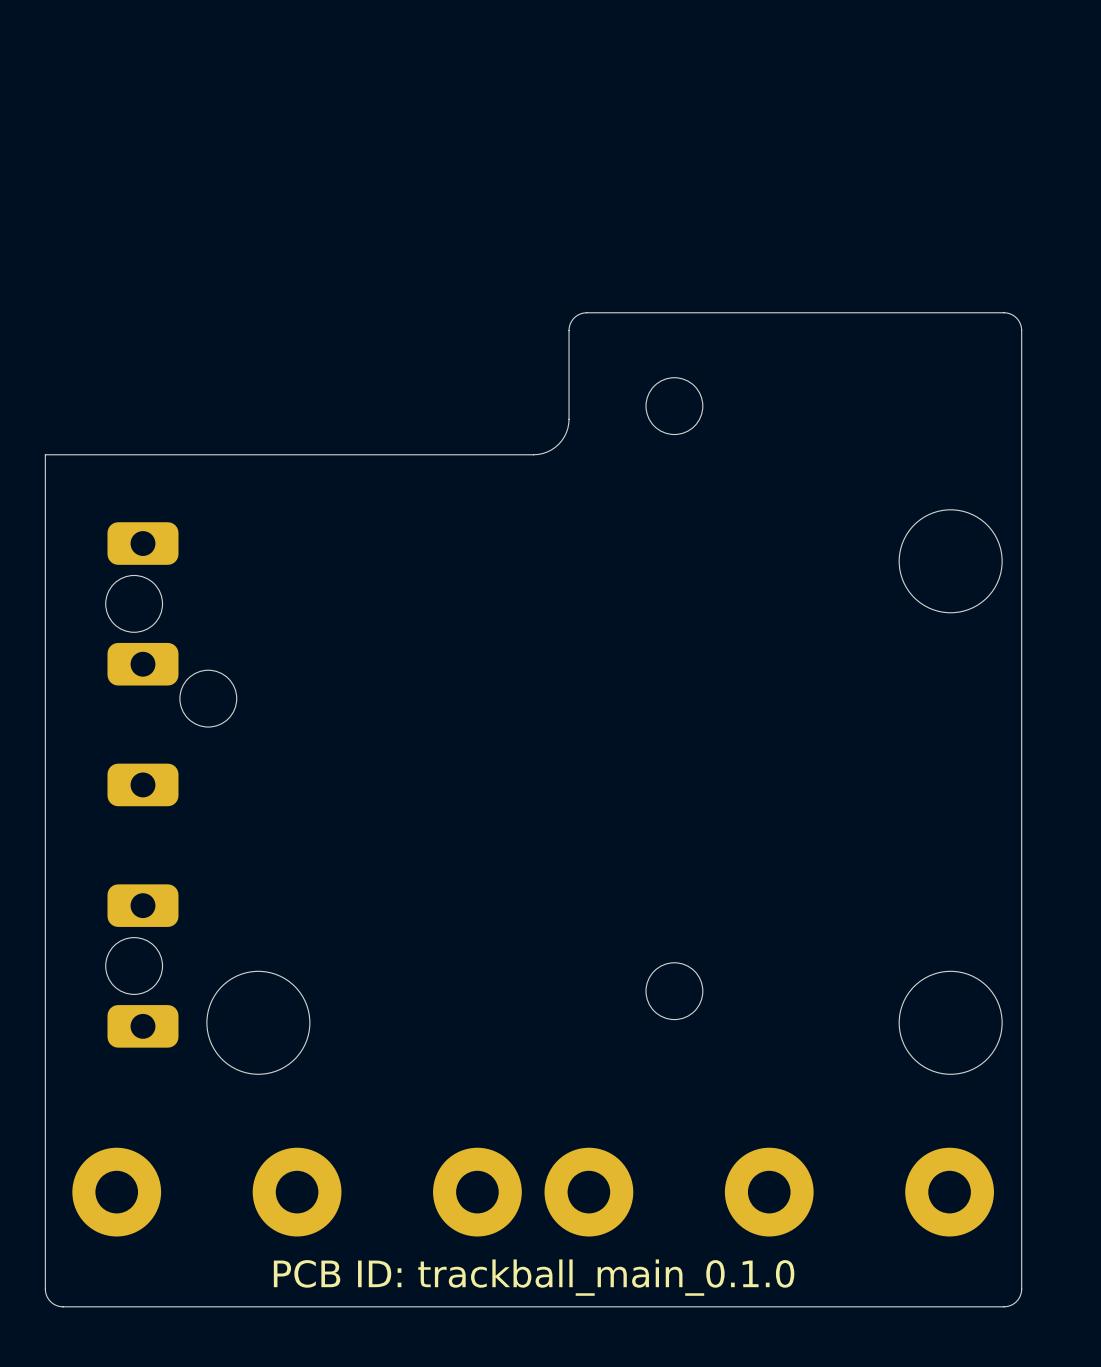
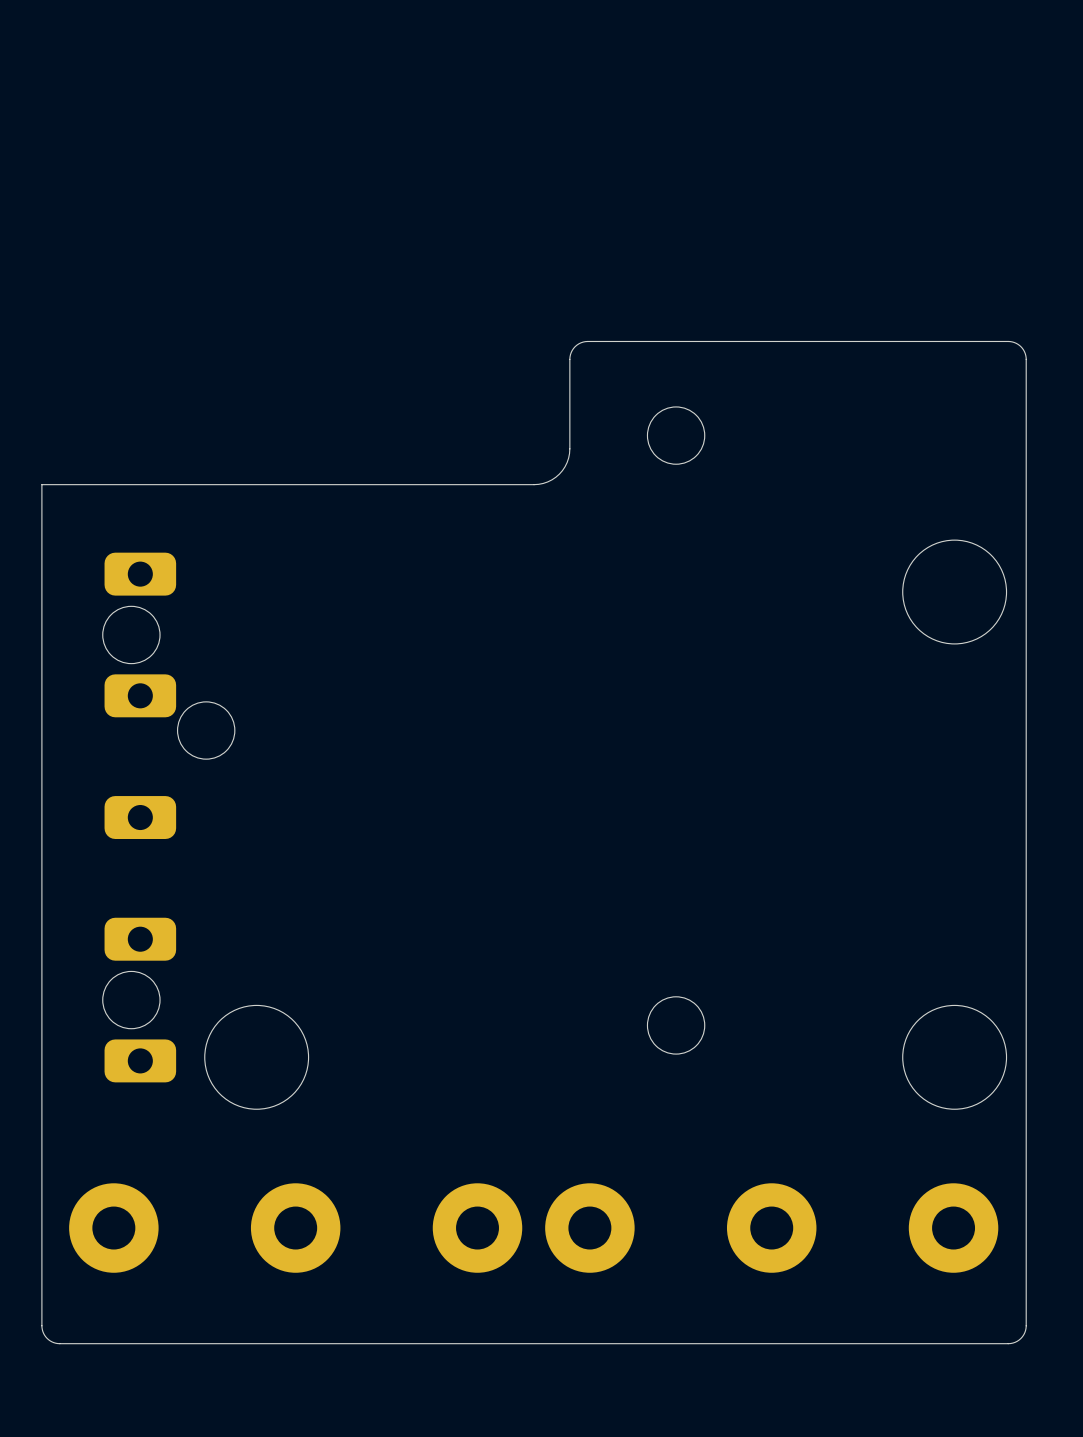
text: PCB ID: trackball_main_0.1.0 (534, 1277) -> none

